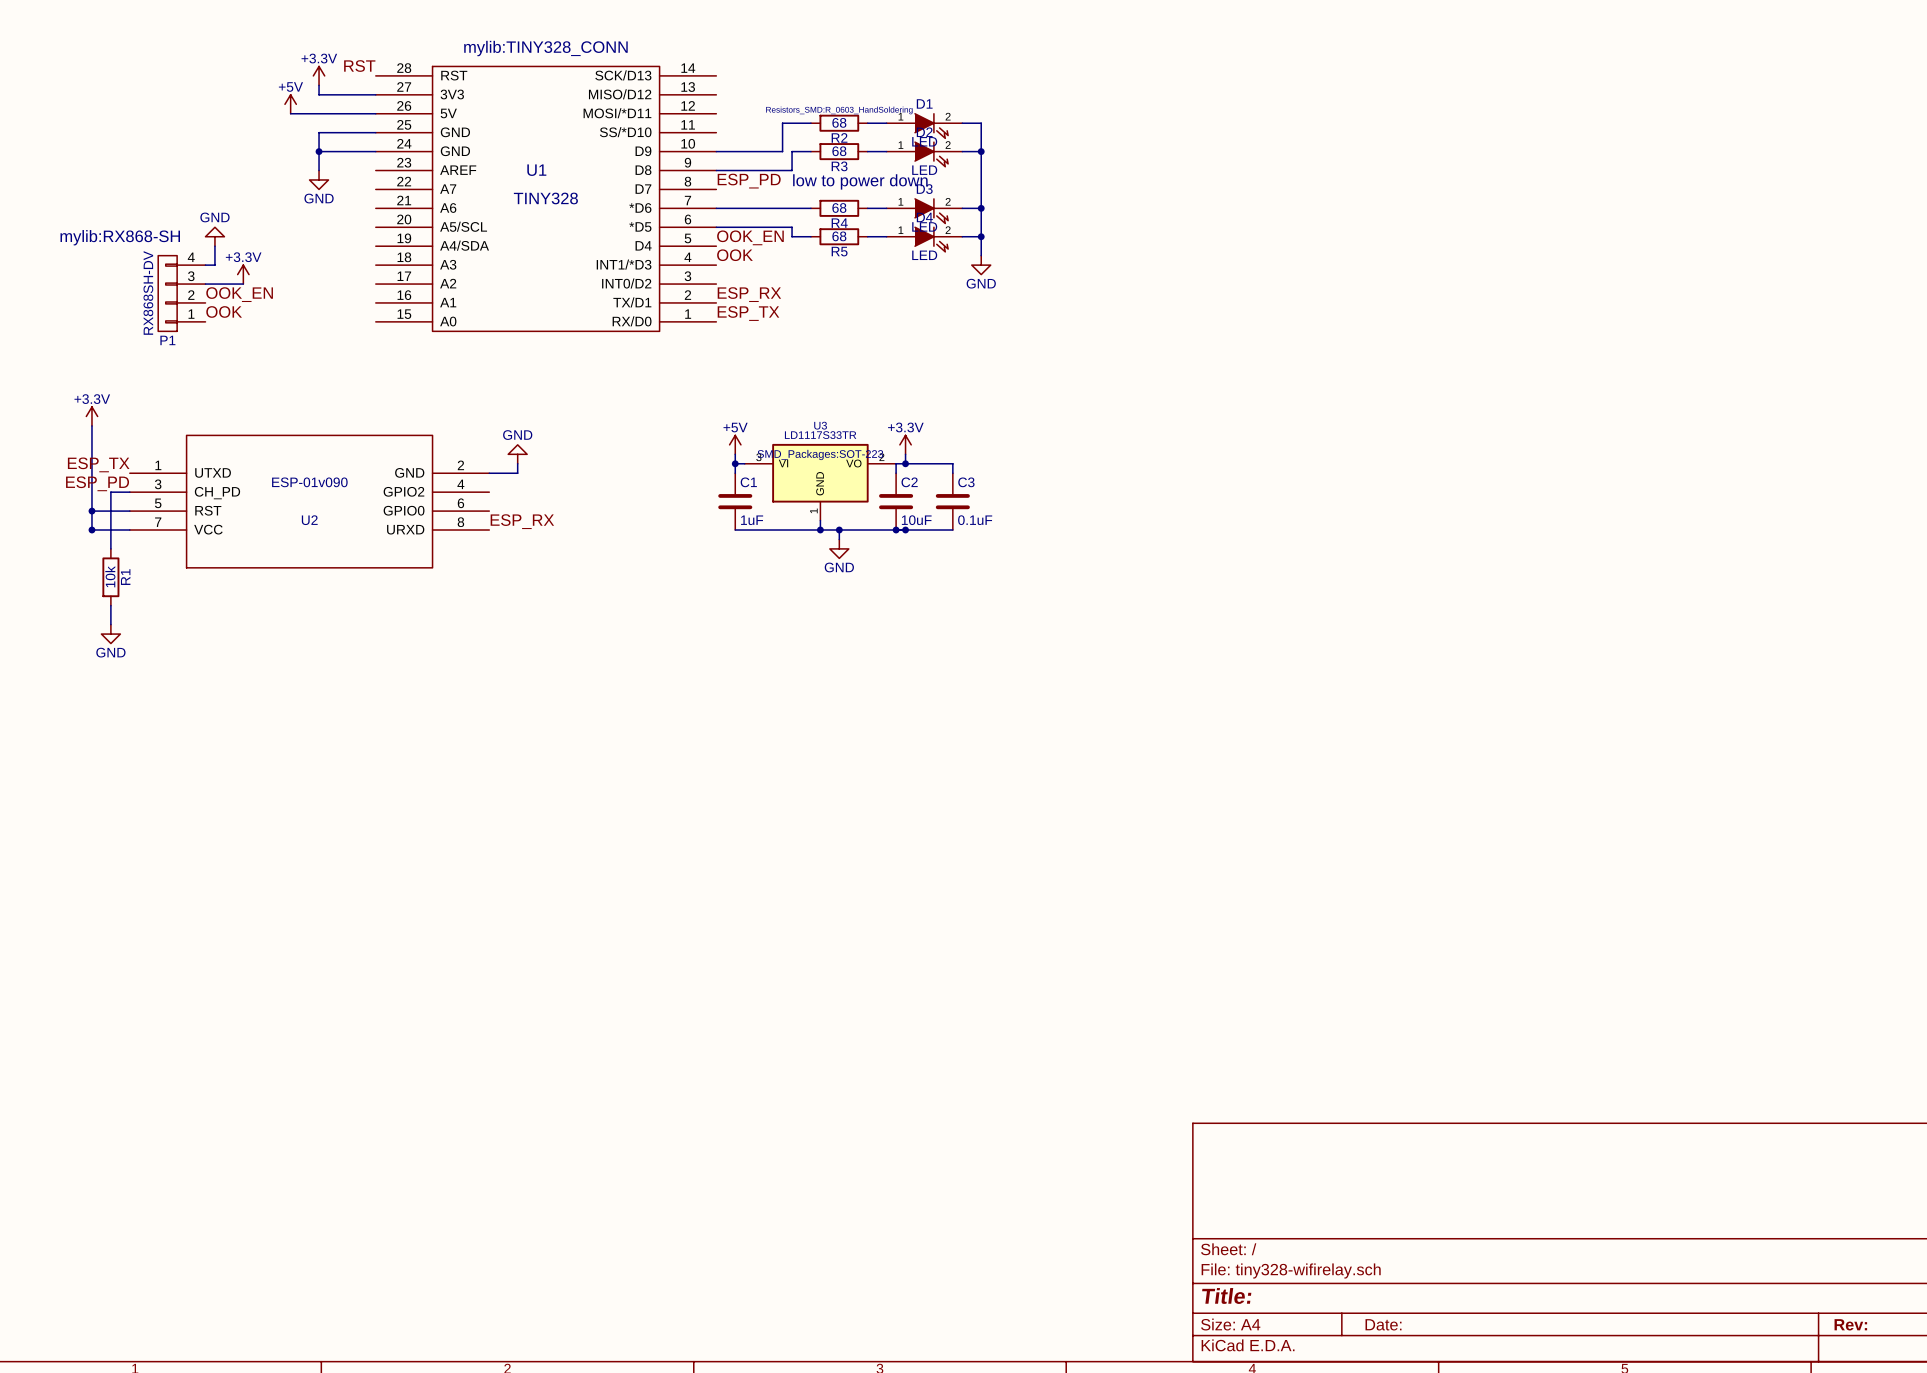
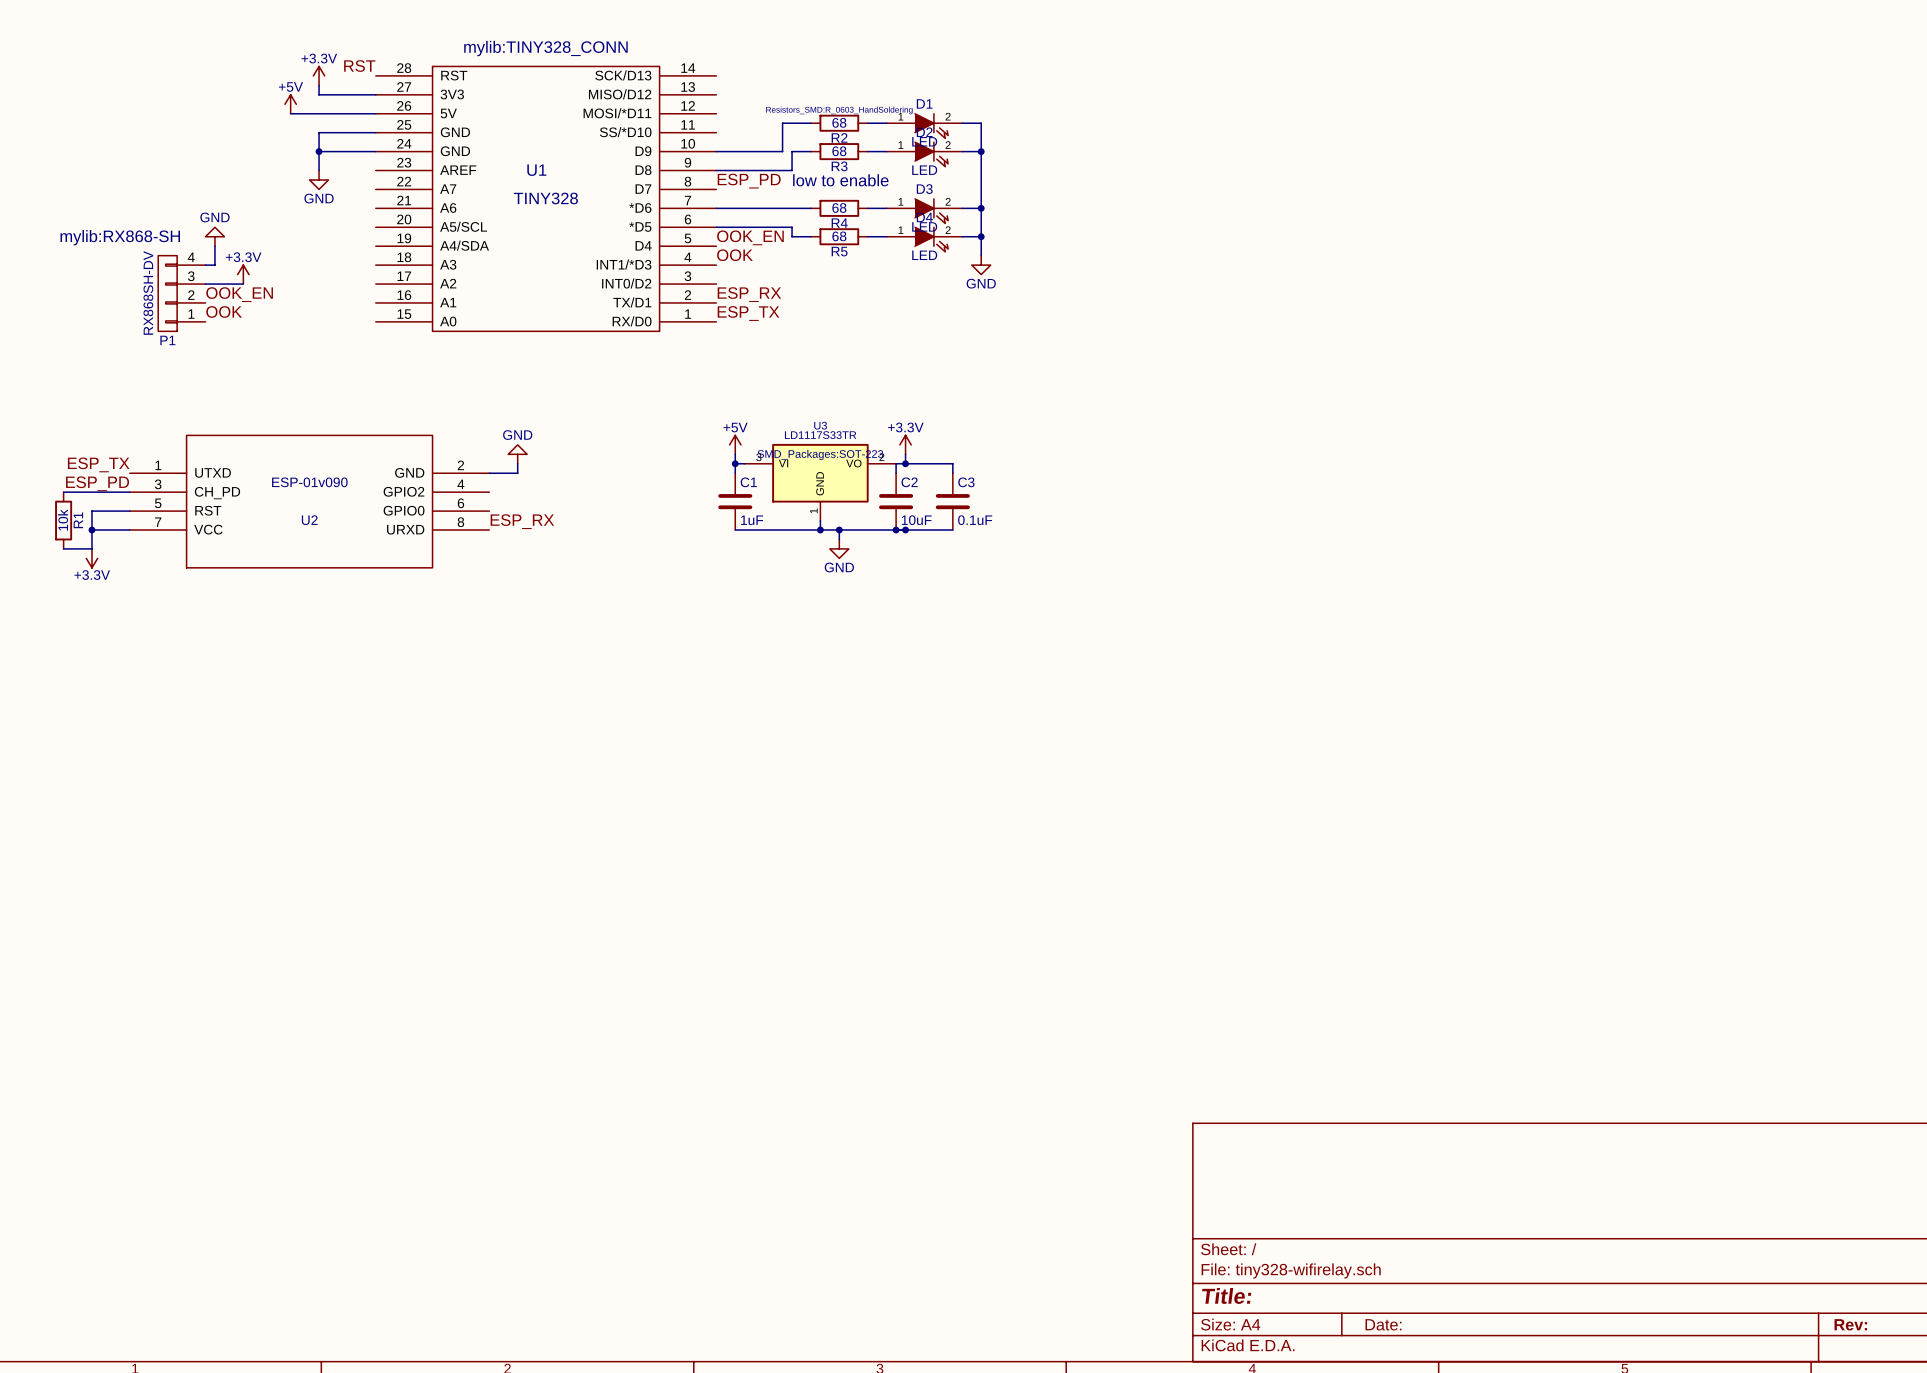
text: low to power down (860, 181) -> low to enable (840, 180)
power symbol rotation: 0° (91, 416) -> 180° (91, 558)
power symbol position: +3.3V (91, 416) -> +3.3V (91, 558)
wire: (91, 425) (91, 511) -> none
wire: (110, 492) (110, 548) -> (110, 492) (63, 492)
junction: (91, 511) -> none
wire: none -> (91, 530) (91, 548) (63, 548)
R1 position: (110, 577) -> (63, 520)
wire: (110, 605) (110, 624) -> none
power symbol: GND (110, 634) -> none

